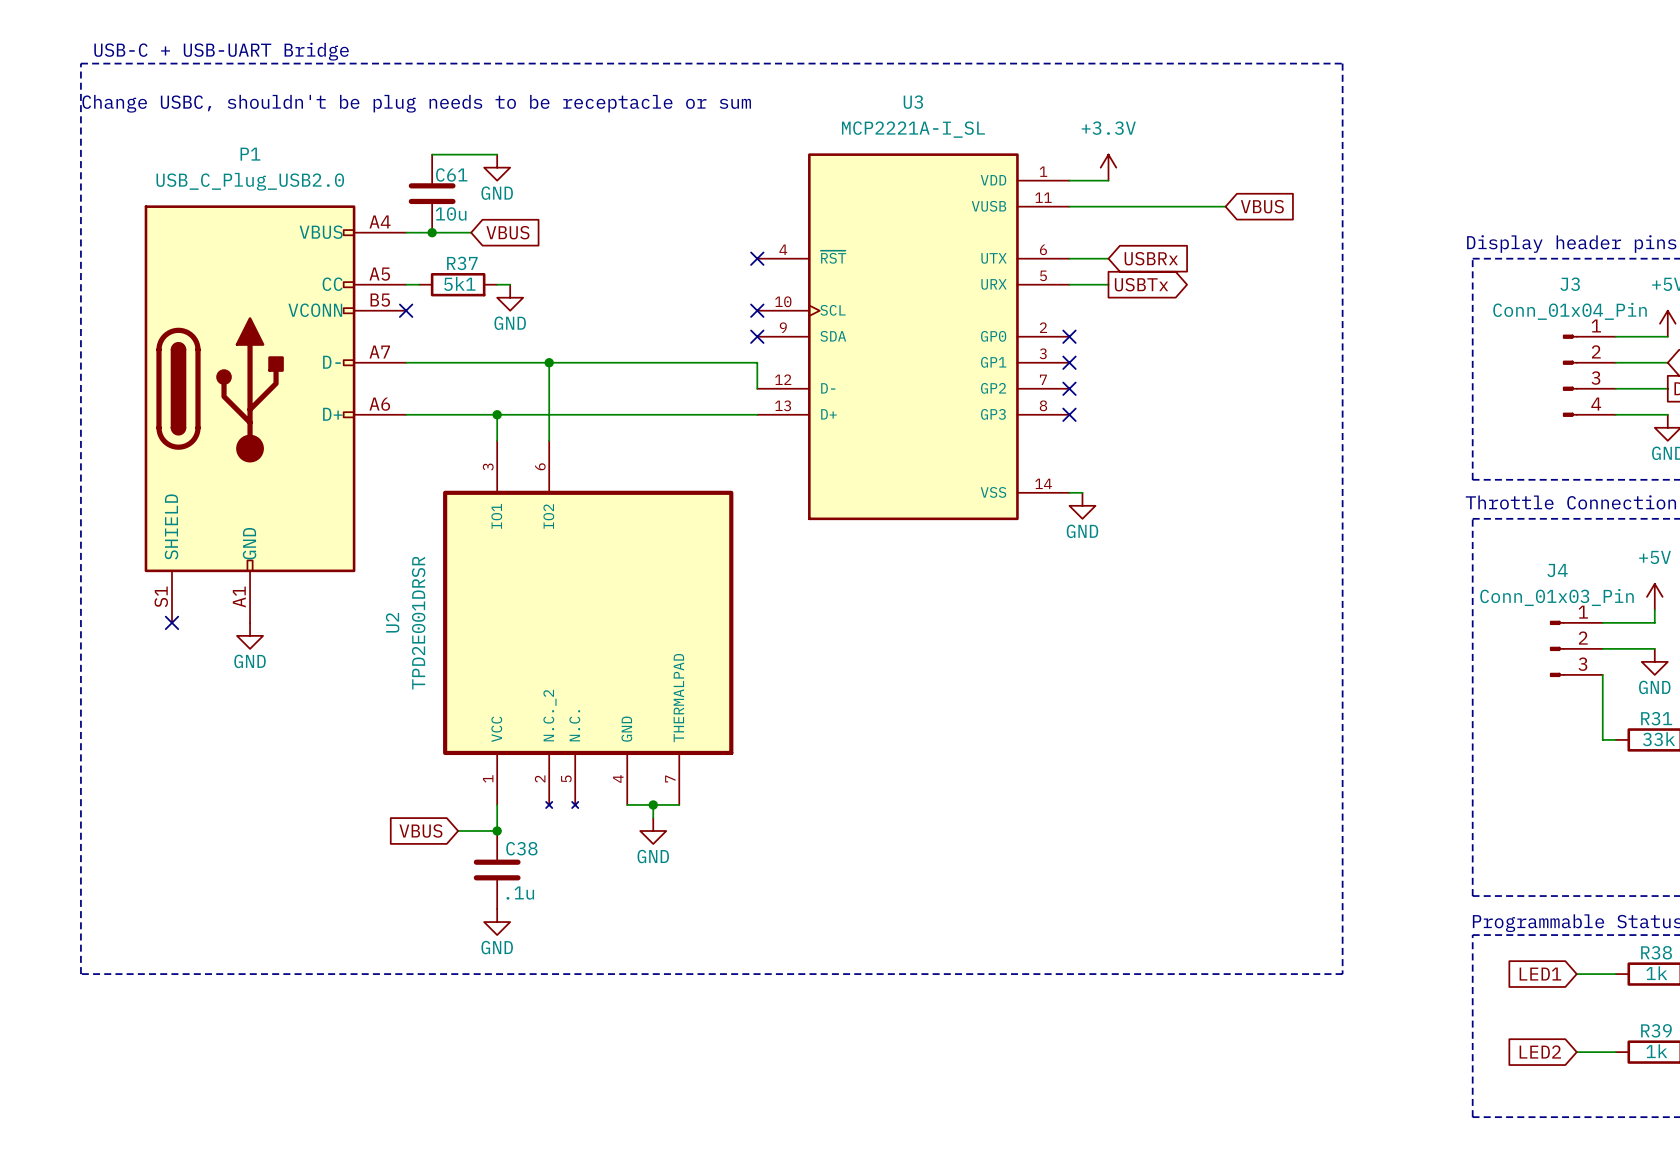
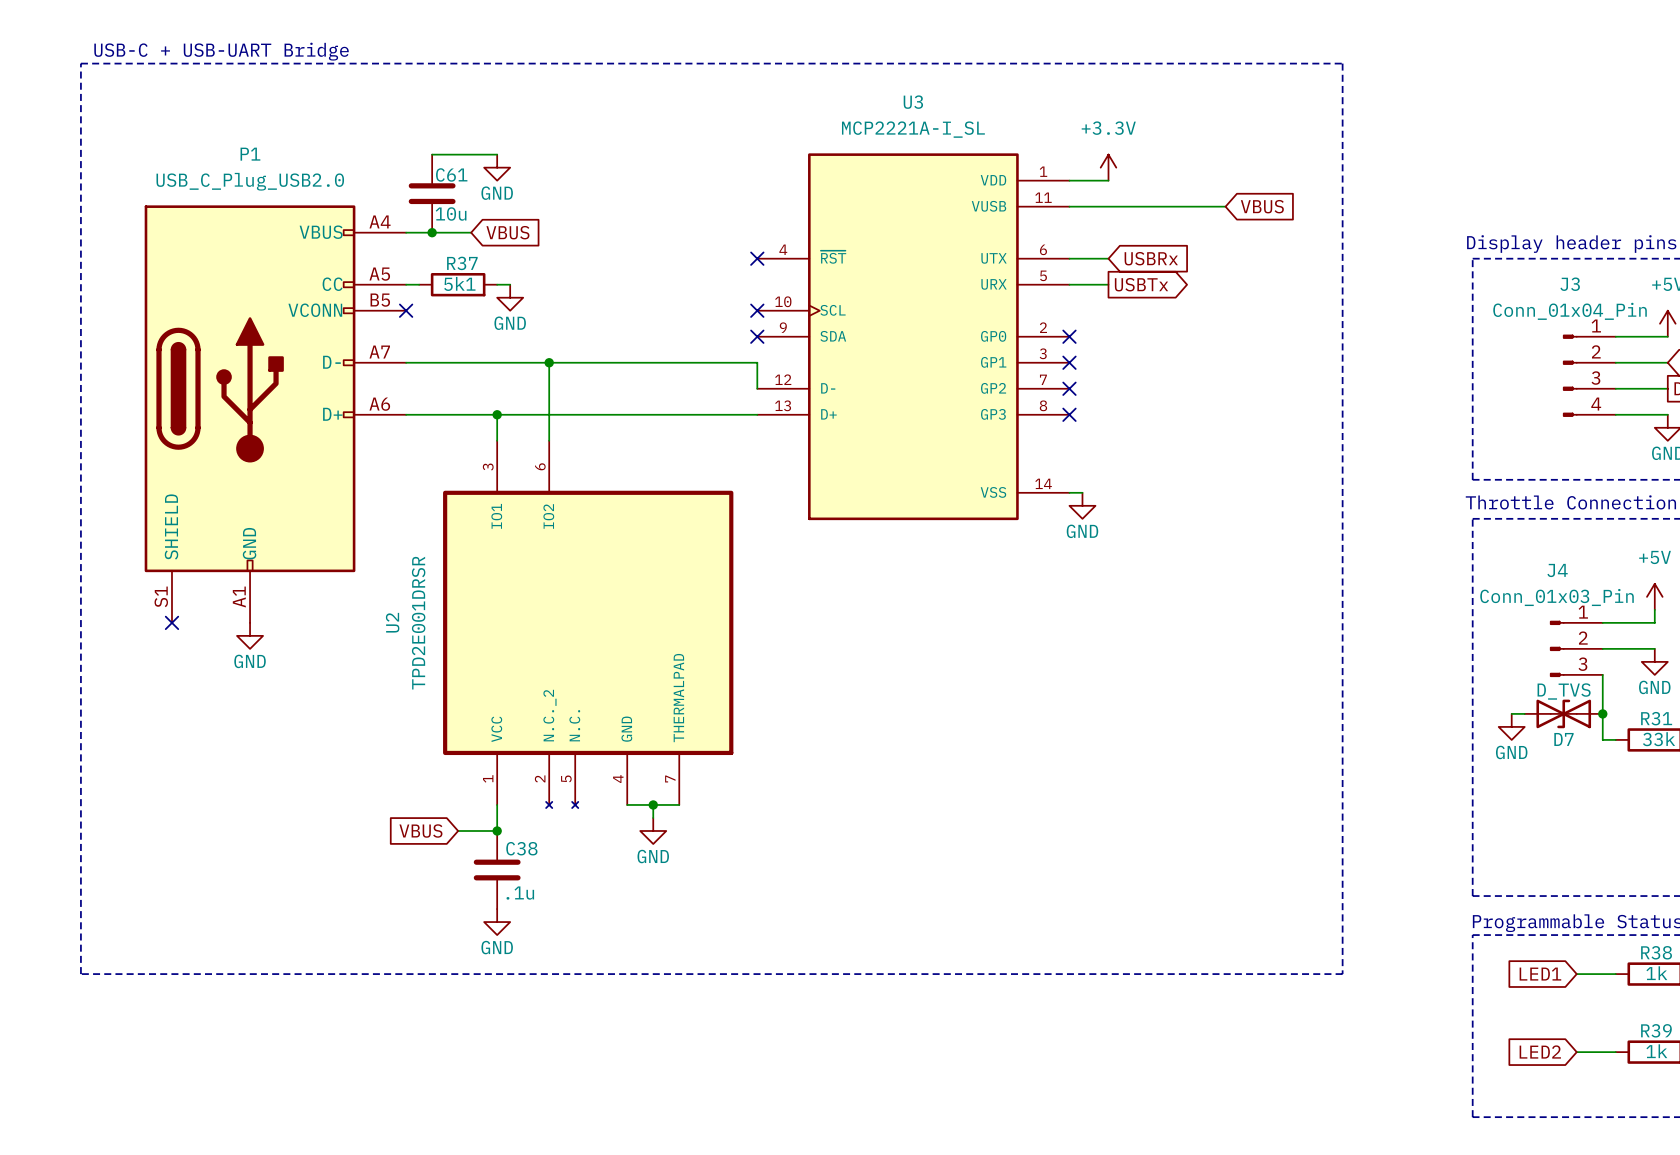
text: Change USBC, shouldn't be plug needs to be receptacle or sum (416, 103) -> none
wire: none -> (1511, 713) (1524, 713)
D7: none -> D_TVS (1563, 713)
junction: none -> (1602, 713)
power symbol: none -> GND (1511, 726)

